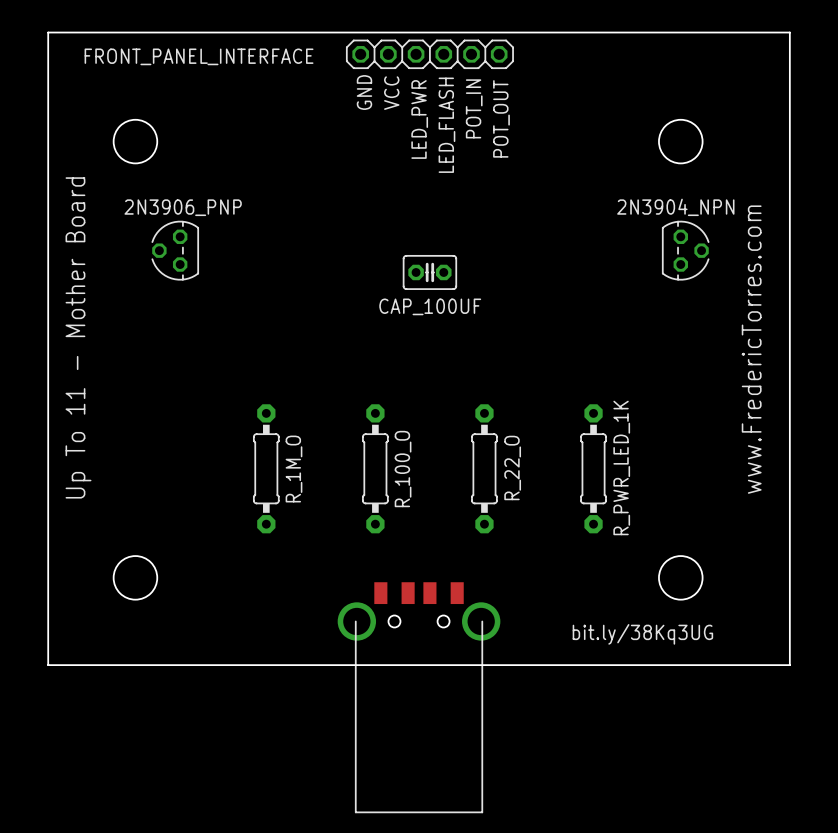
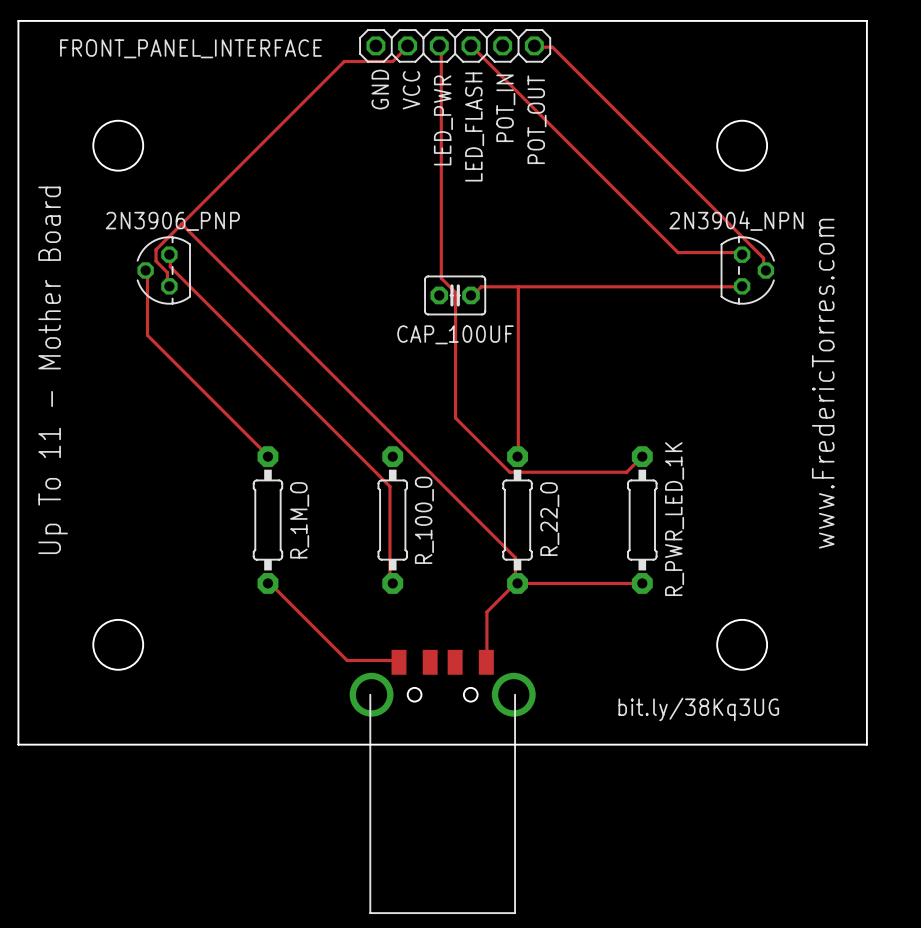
track: none -> (407, 45) (392, 61) (344, 61) (156, 249) (156, 261) (167, 272) (167, 283) (169, 286)
track: none -> (439, 45) (441, 47) (441, 278) (455, 292) (455, 418) (509, 472) (626, 472) (642, 456)
track: none -> (470, 45) (678, 252) (740, 252) (742, 254)
track: none -> (534, 45) (552, 47) (763, 258) (763, 269) (765, 270)
track: none -> (181, 224) (515, 557) (515, 580) (517, 583)
track: none -> (169, 254) (170, 266) (389, 486) (389, 580) (392, 583)
track: none -> (145, 270) (147, 272) (147, 335) (267, 456)
track: none -> (518, 286) (517, 456)
track: none -> (742, 286) (481, 286) (470, 295)
track: none -> (267, 583) (347, 660) (398, 660) (398, 662)
track: none -> (517, 583) (486, 611) (486, 662)
track: none -> (517, 583) (642, 583)

